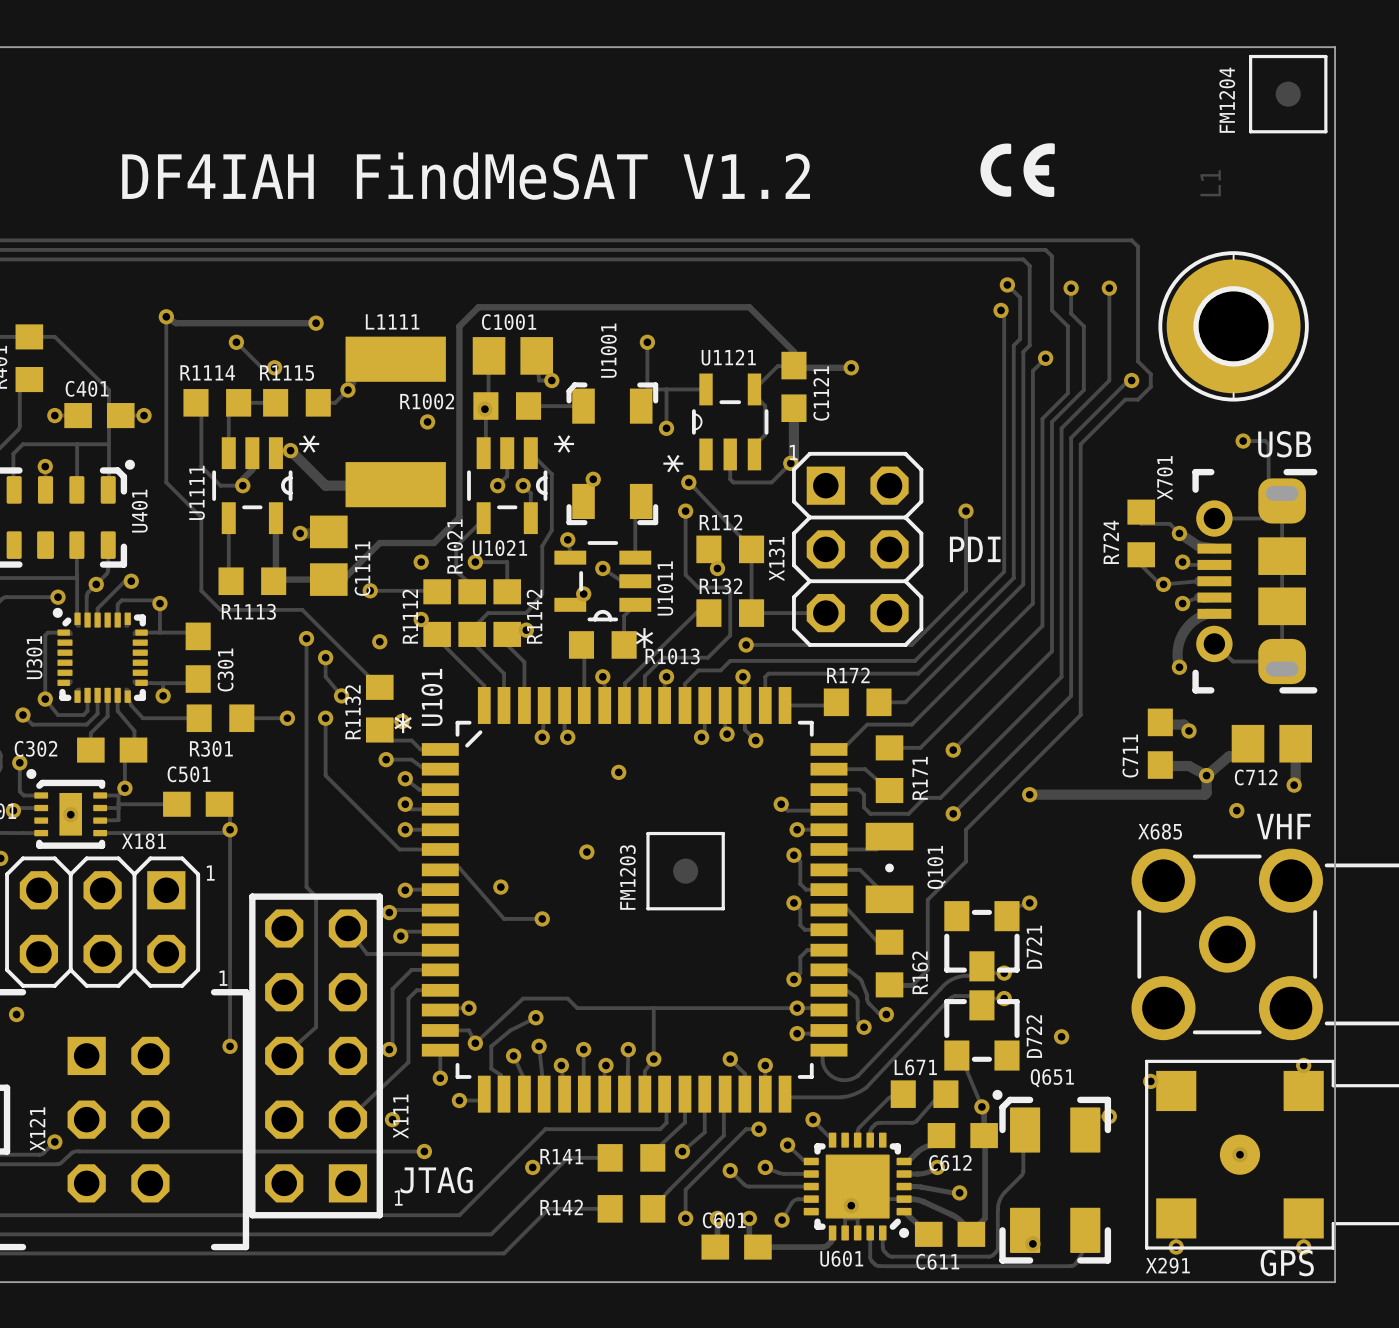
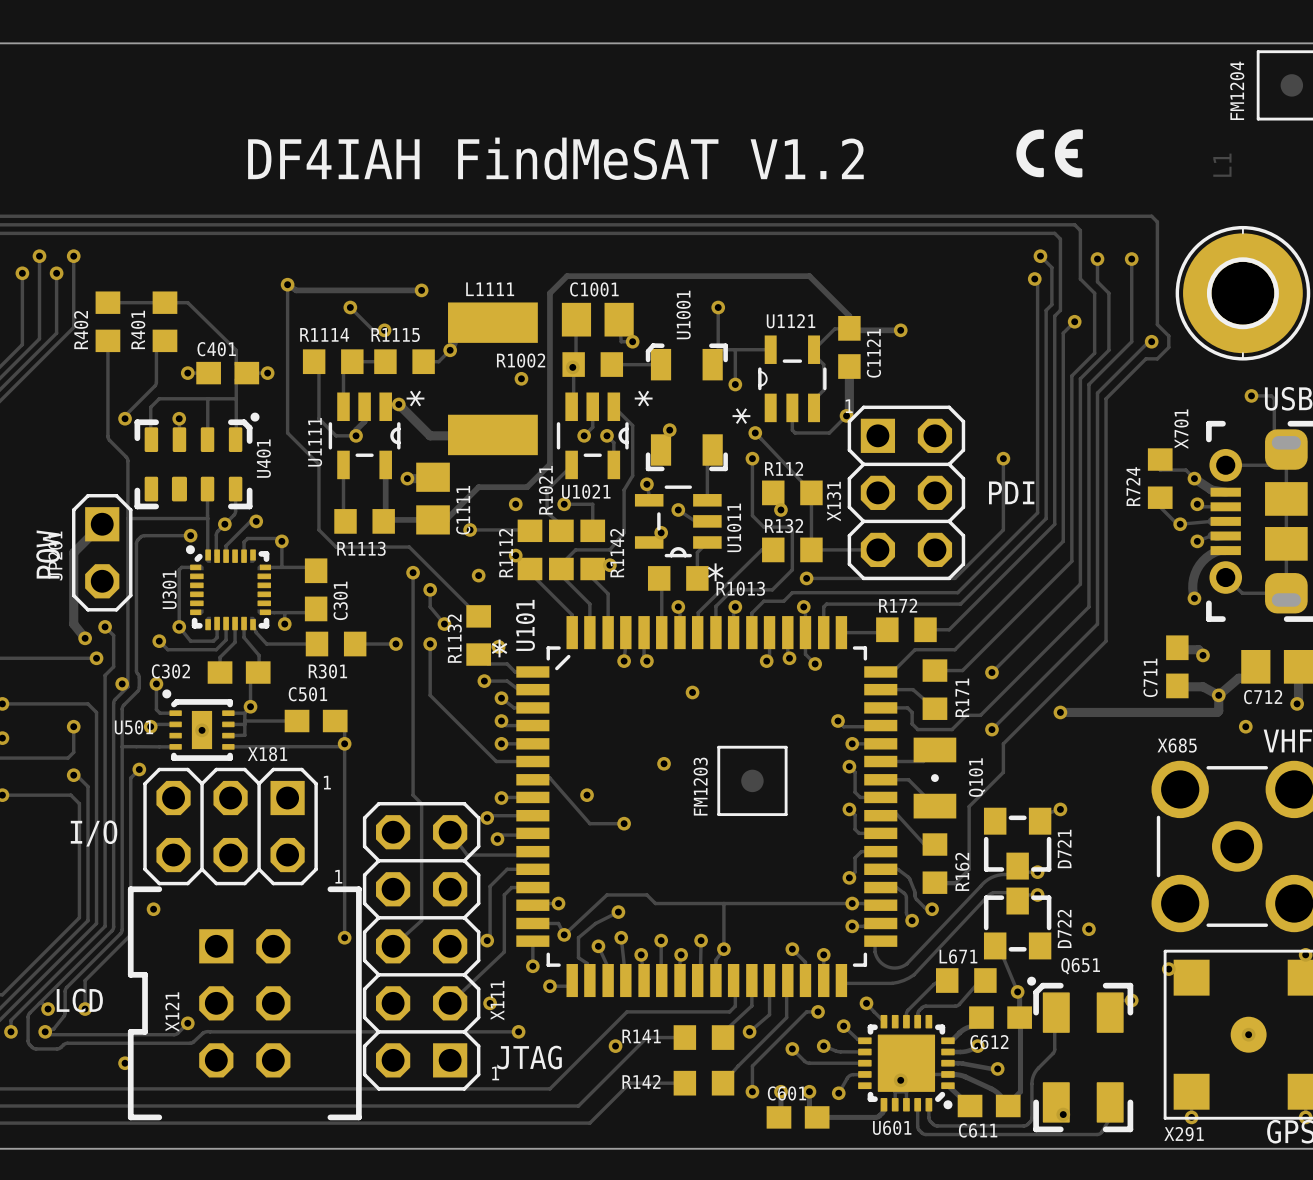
X111 footprint: [249, 893, 383, 1219] -> [362, 802, 481, 1091]

